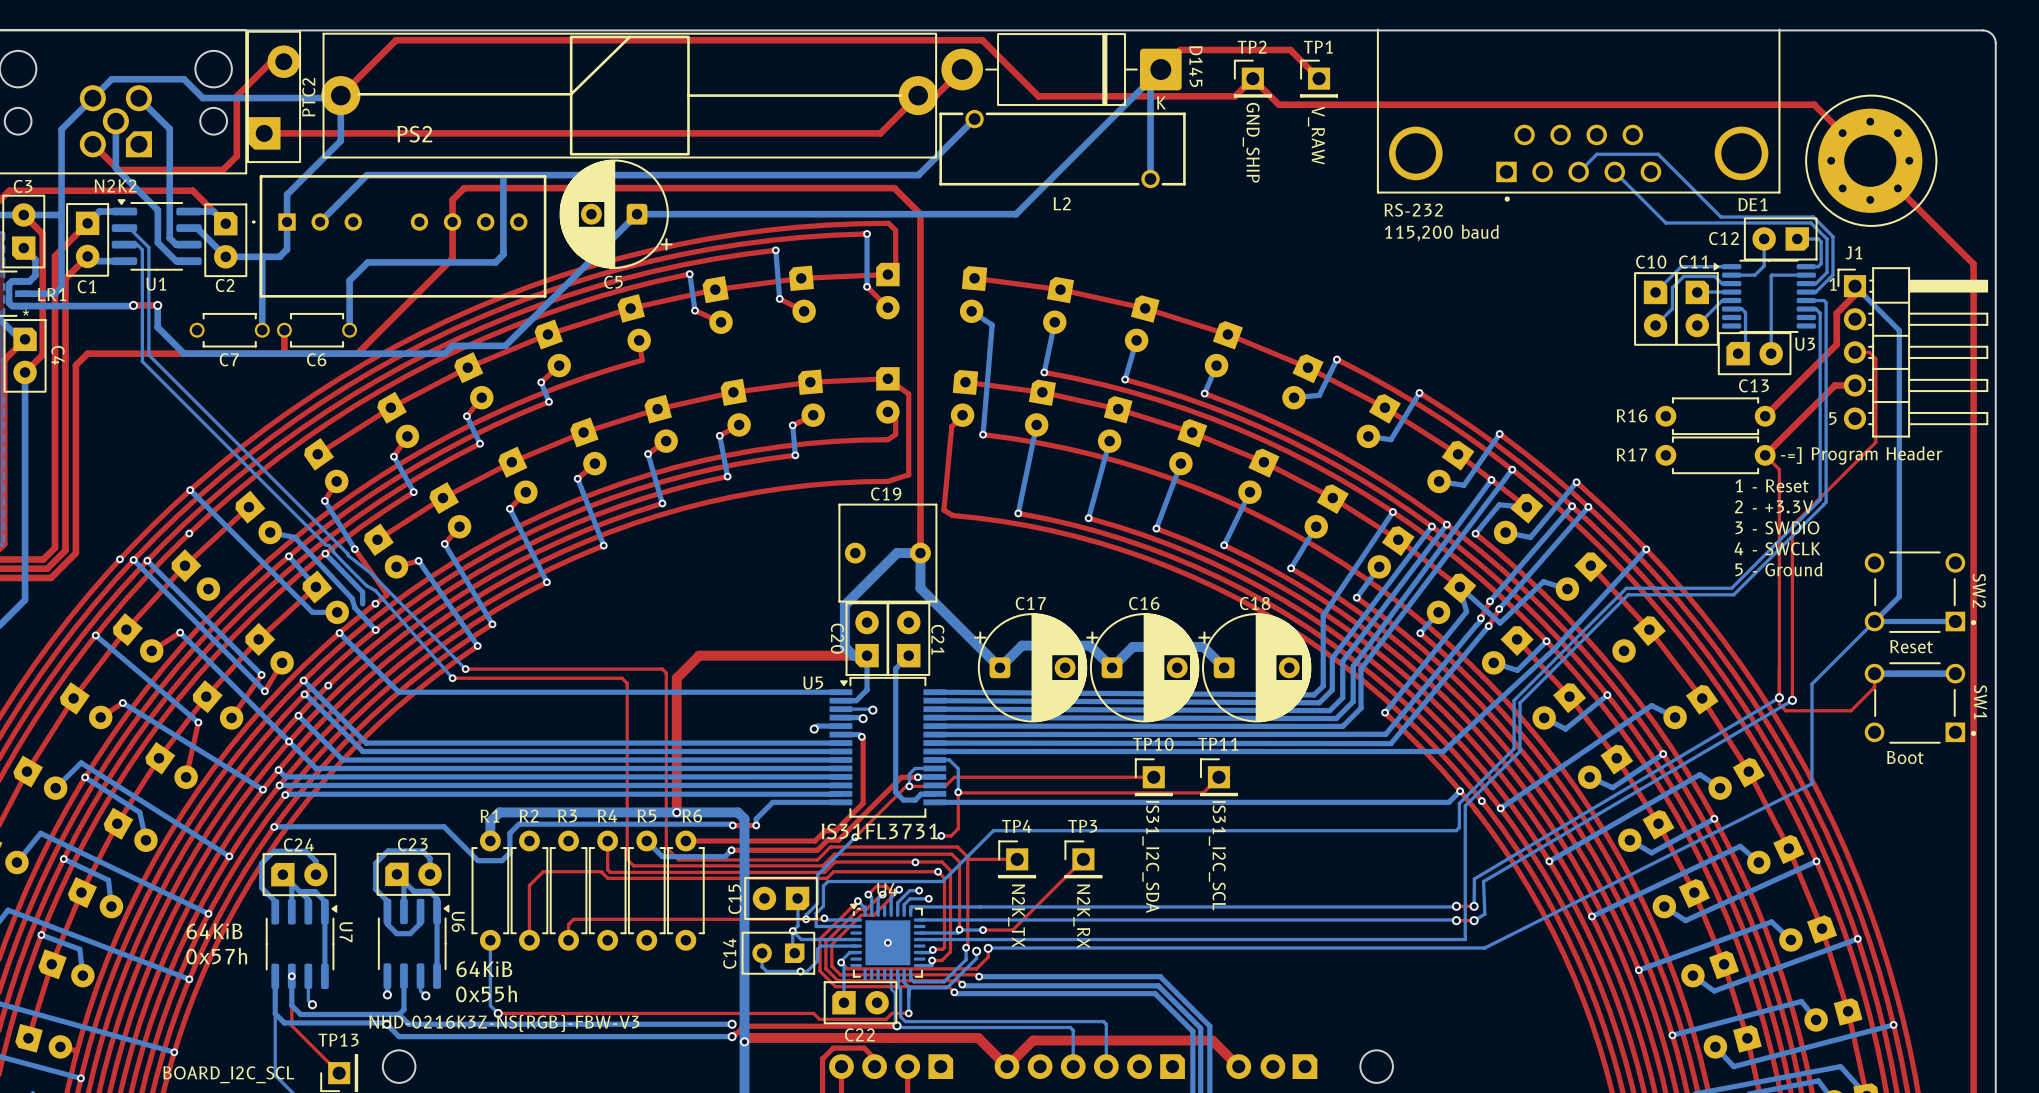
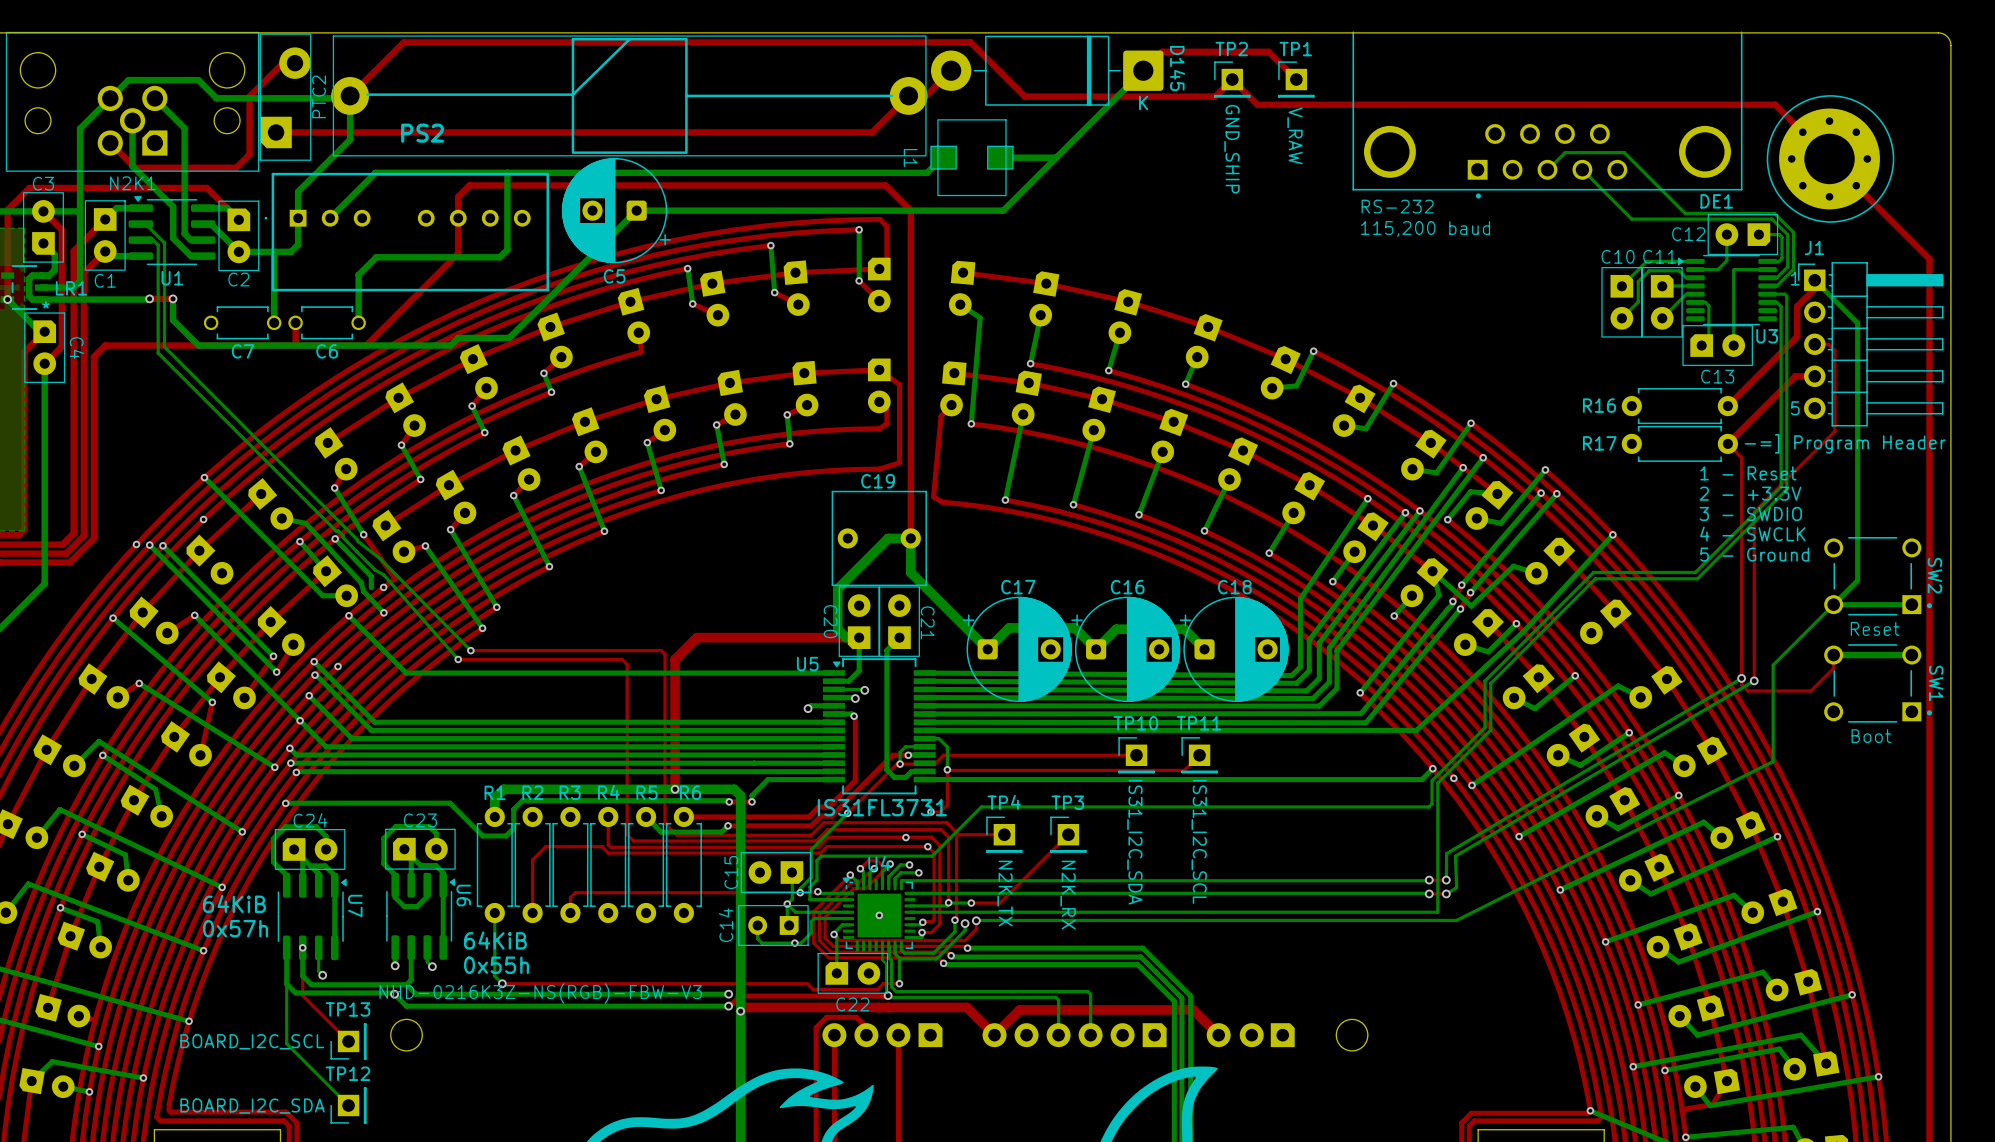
bottom track: (1150, 79) (1150, 179) -> none
bottom track: (974, 119) (918, 175) -> (943, 157) (927, 172) (908, 172)
L2: (1062, 149) -> none
L1: none -> (971, 157)
bottom track: none -> (1000, 157) (1056, 157)
N2K2 name: N2K2 (115, 185) -> N2K1 (132, 183)

